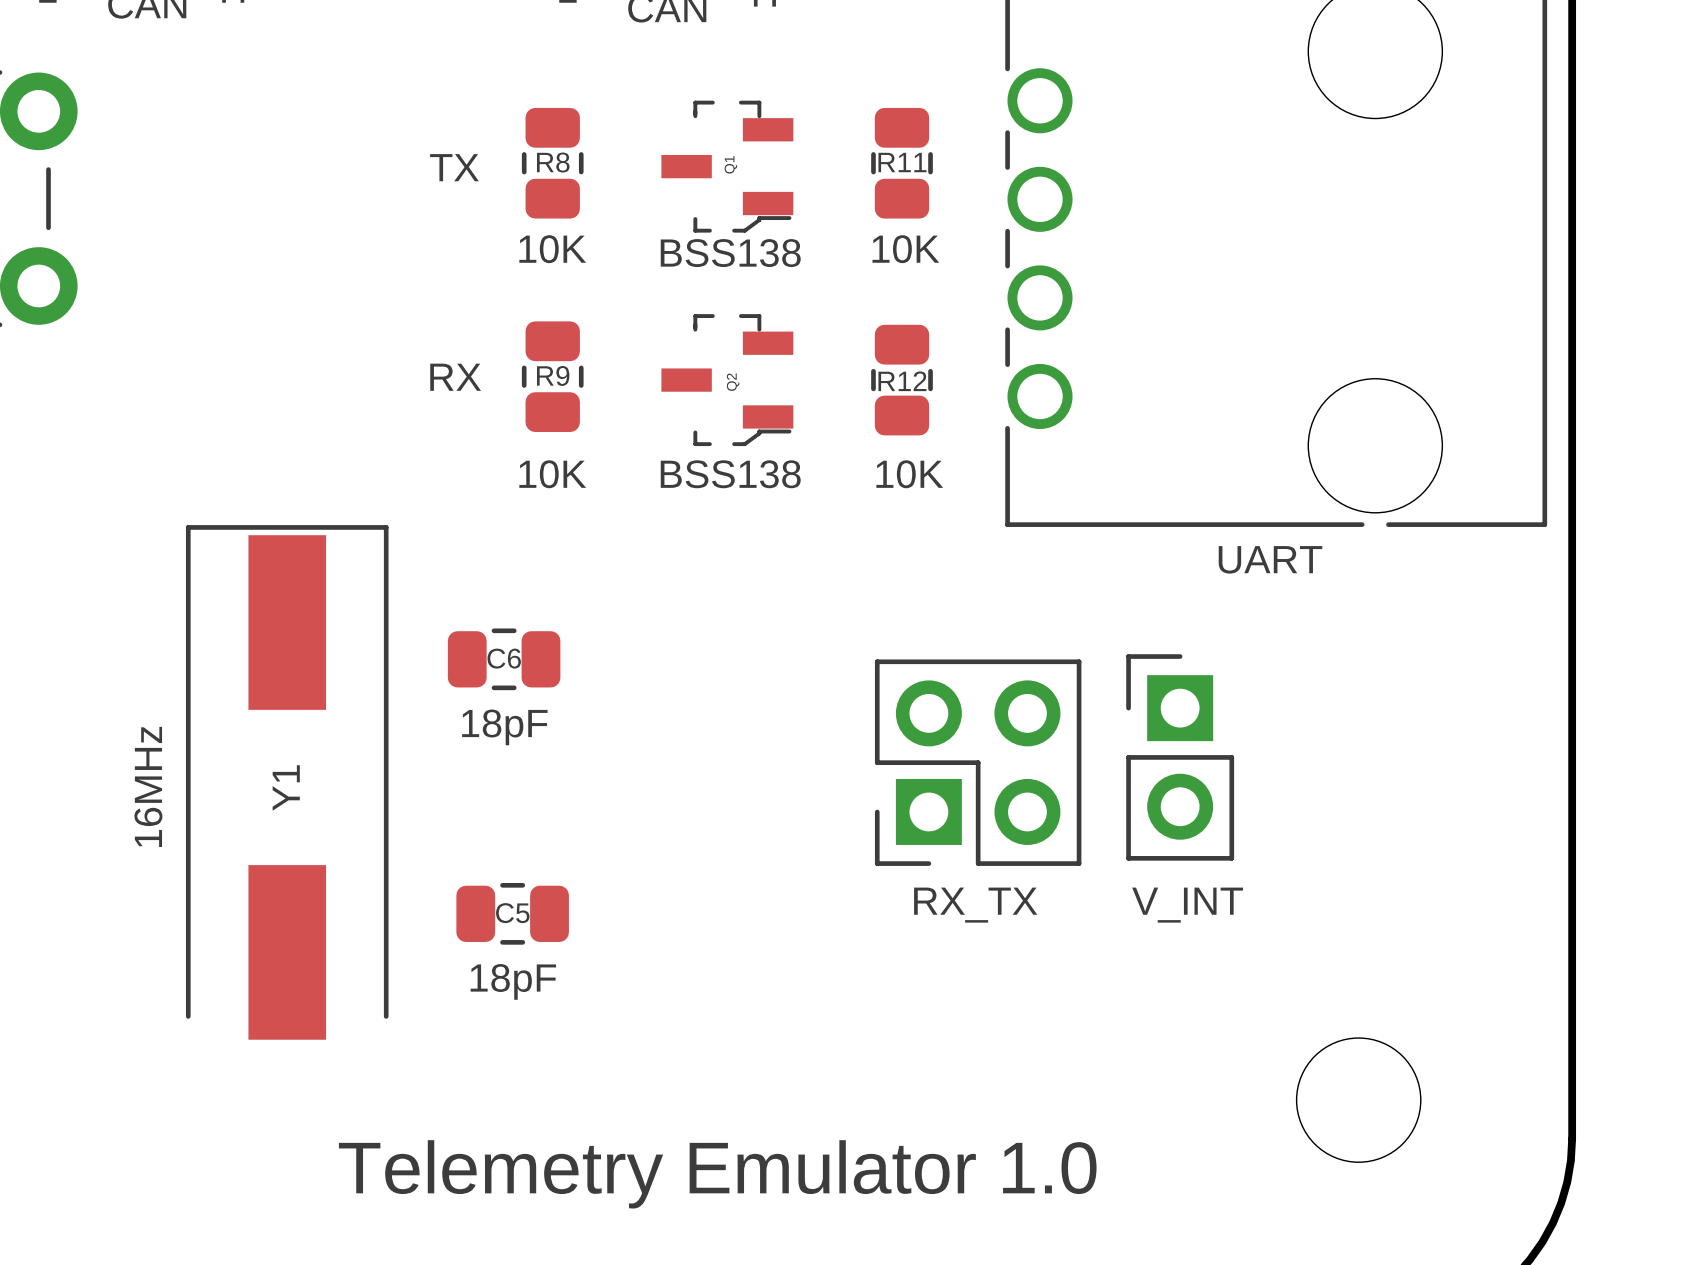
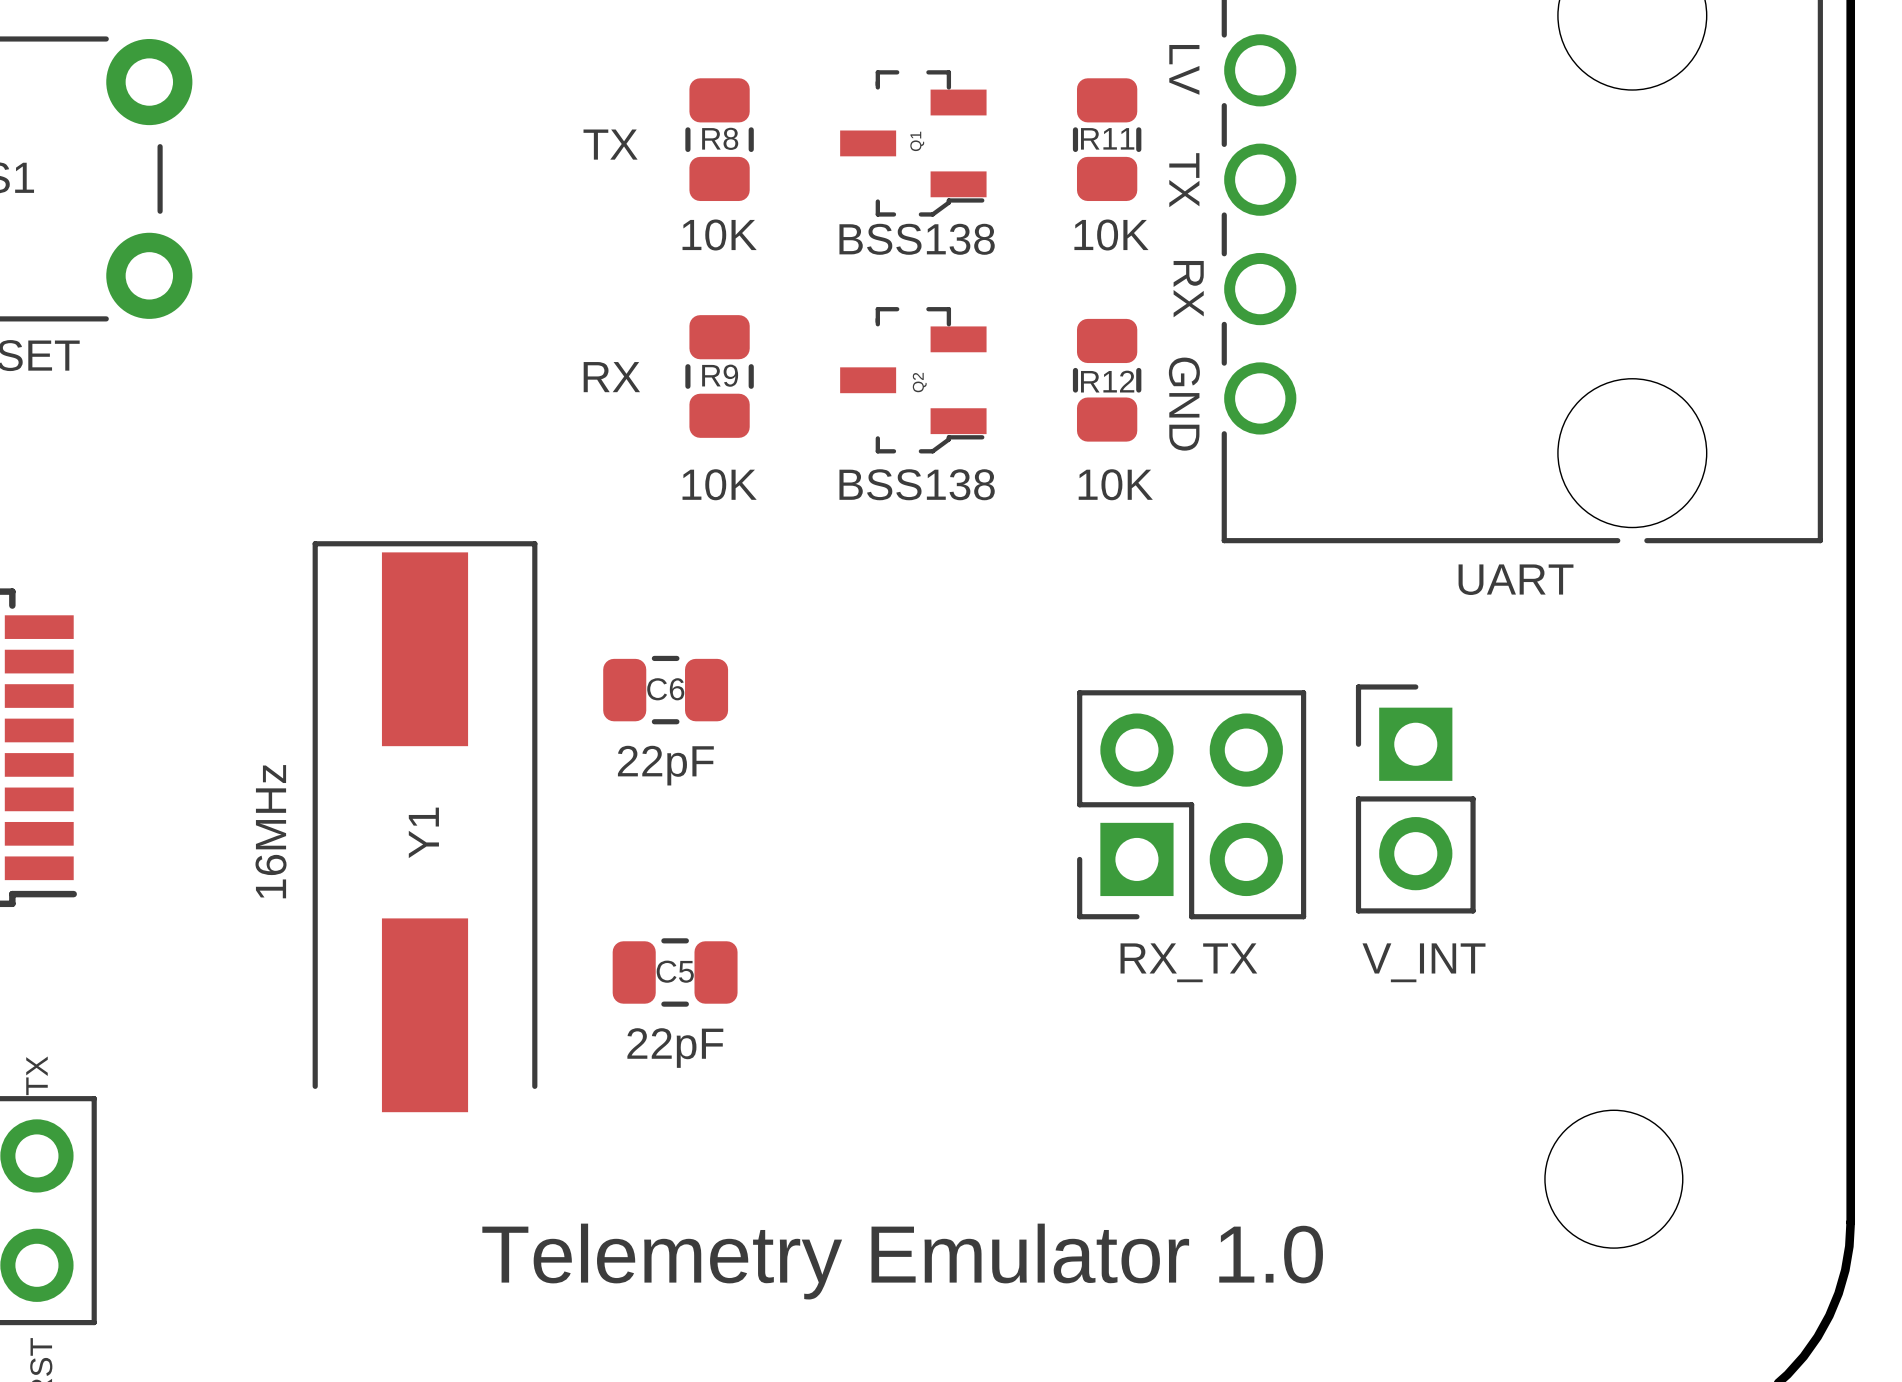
text: none -> LV (1184, 69)
text: none -> TX (1184, 180)
text: none -> RX (1188, 289)
text: none -> GND (1184, 404)
C6 value: 18pF (504, 727) -> 22pF (665, 765)
C5 value: 18pF (513, 981) -> 22pF (675, 1048)

